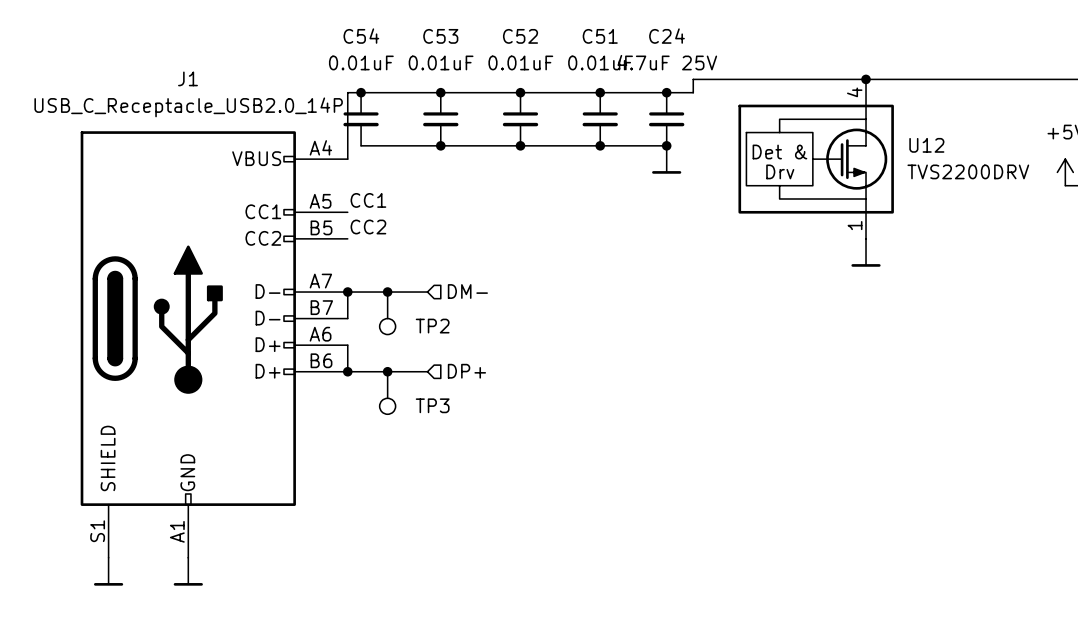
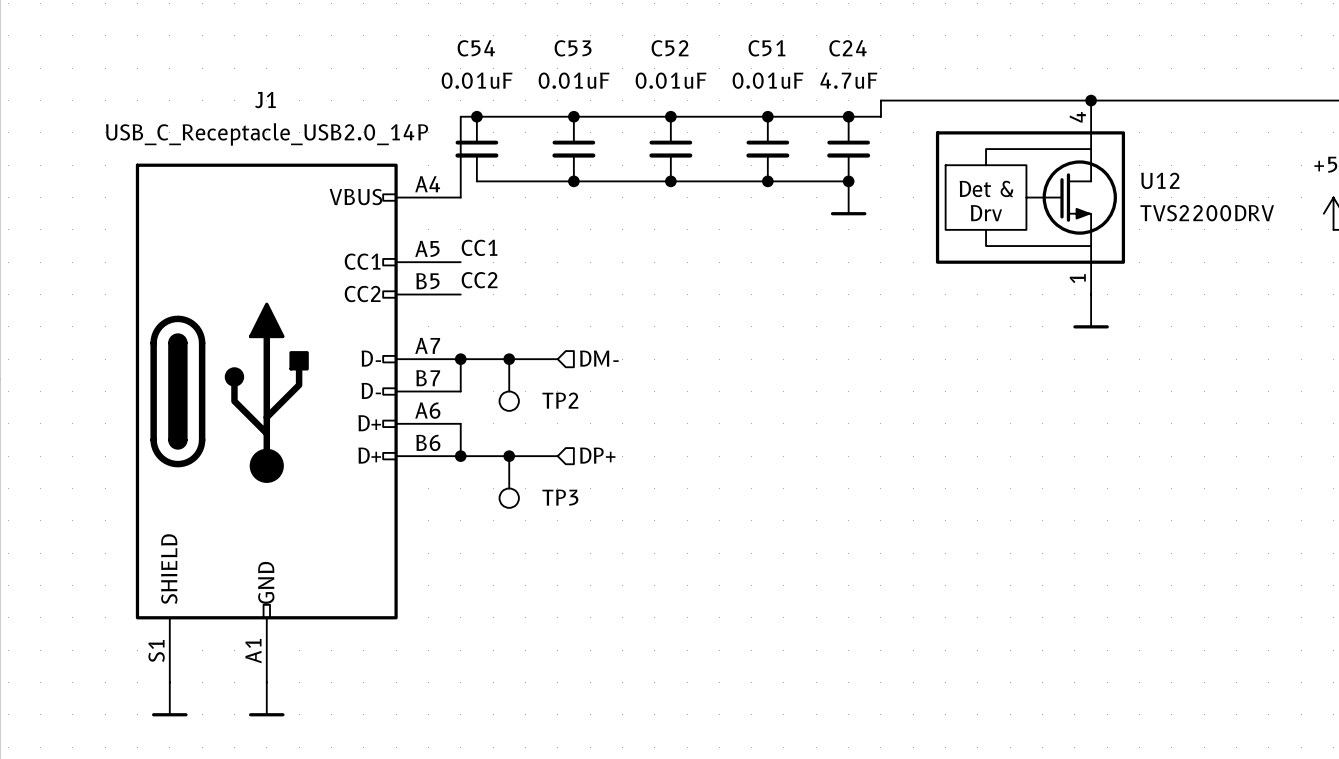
C24 value: 4.7uF 25V (667, 62) -> 4.7uF (848, 80)

